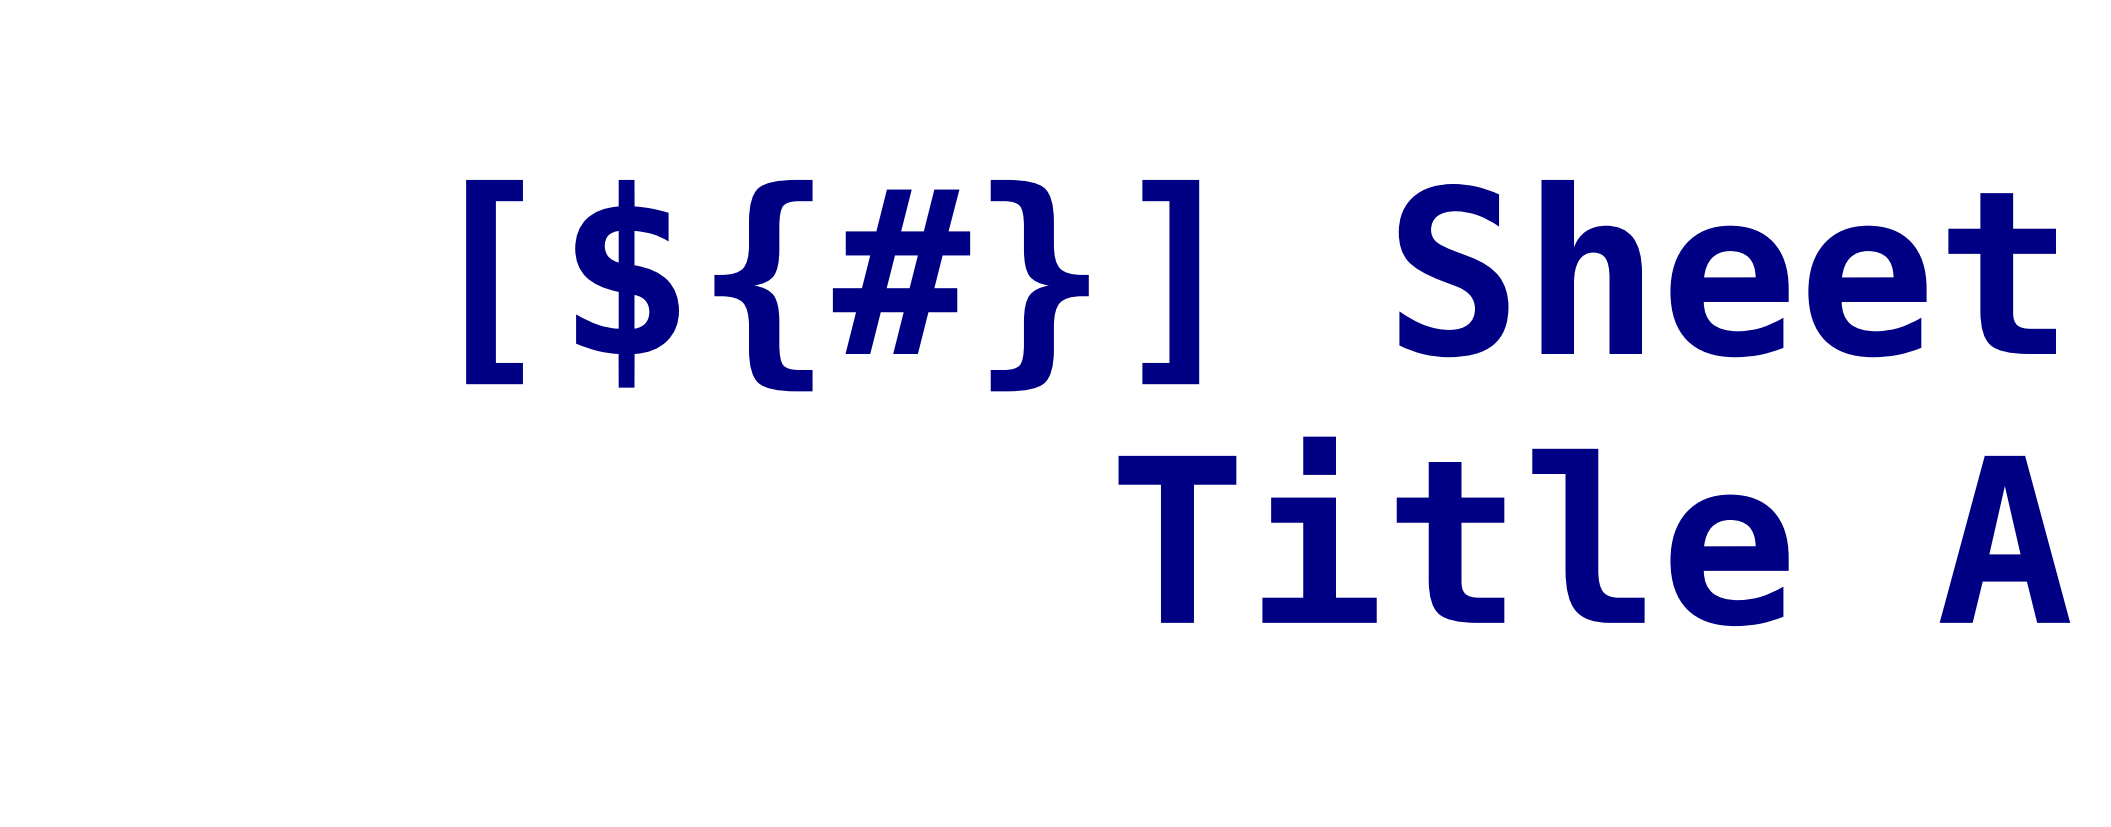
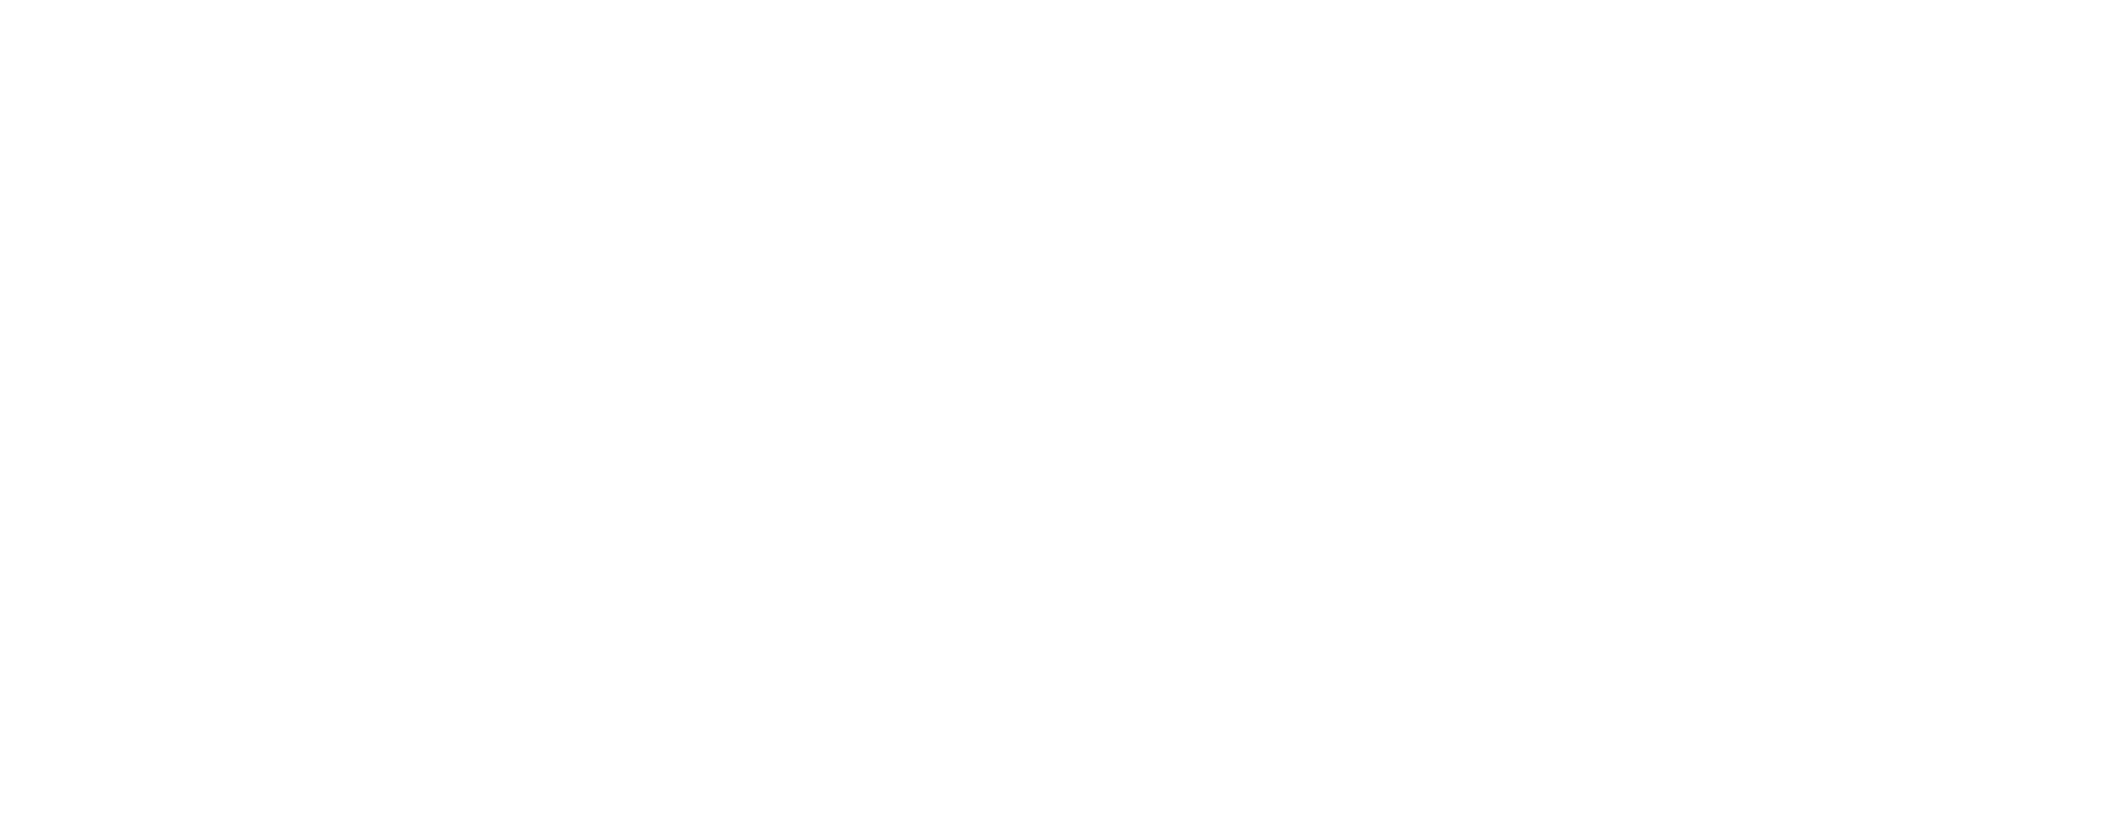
text: [${#}] Sheet (1261, 285) -> none
text: Title A (1594, 531) -> none

